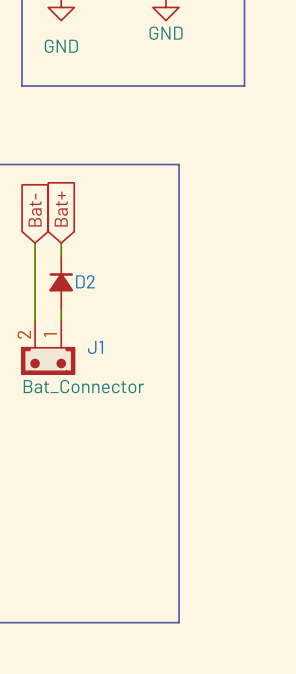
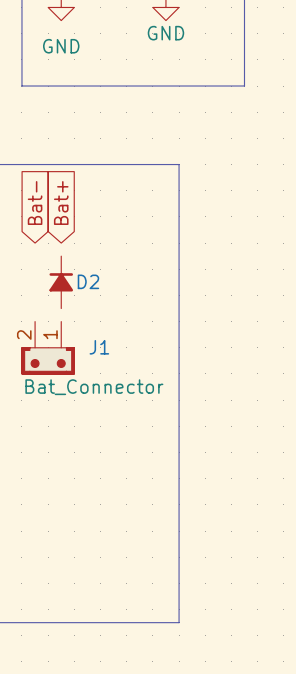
wire: (35, 243) (35, 321) -> none
wire: (61, 243) (61, 256) -> none
wire: (61, 308) (61, 321) -> none

